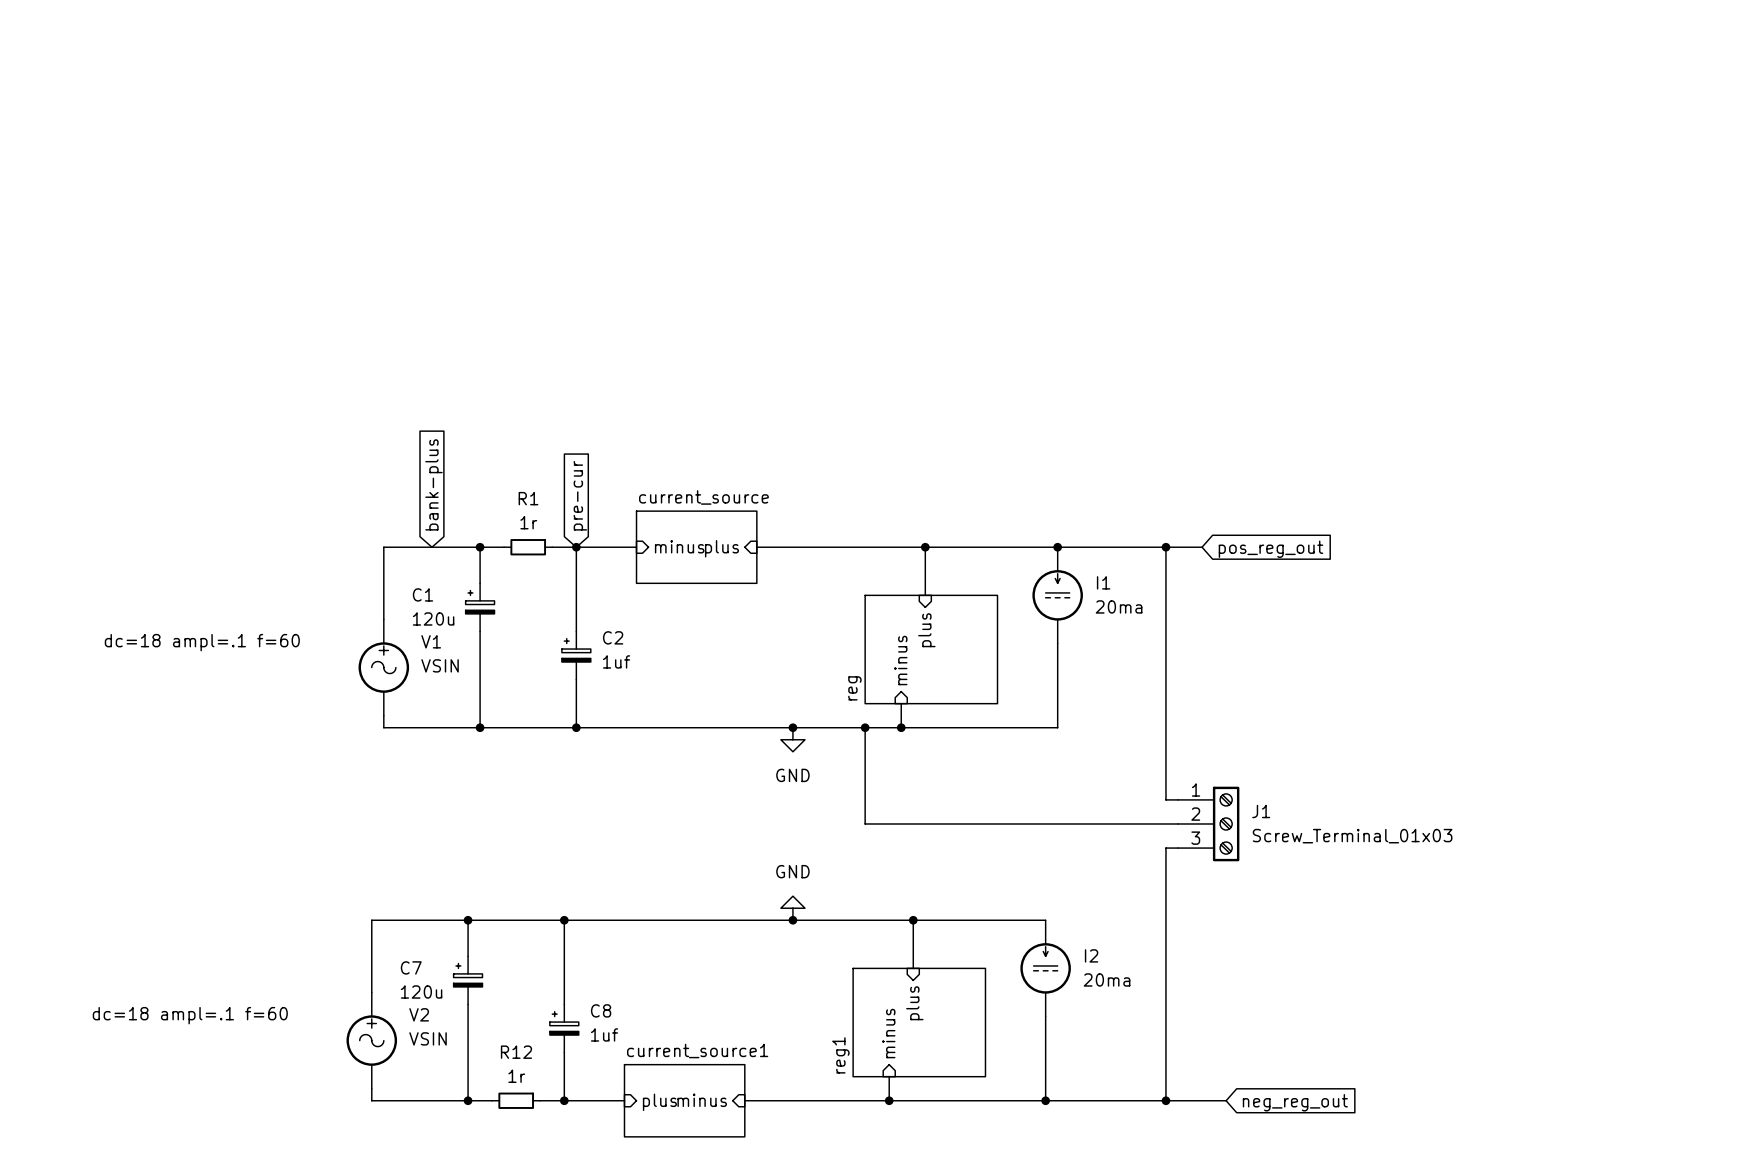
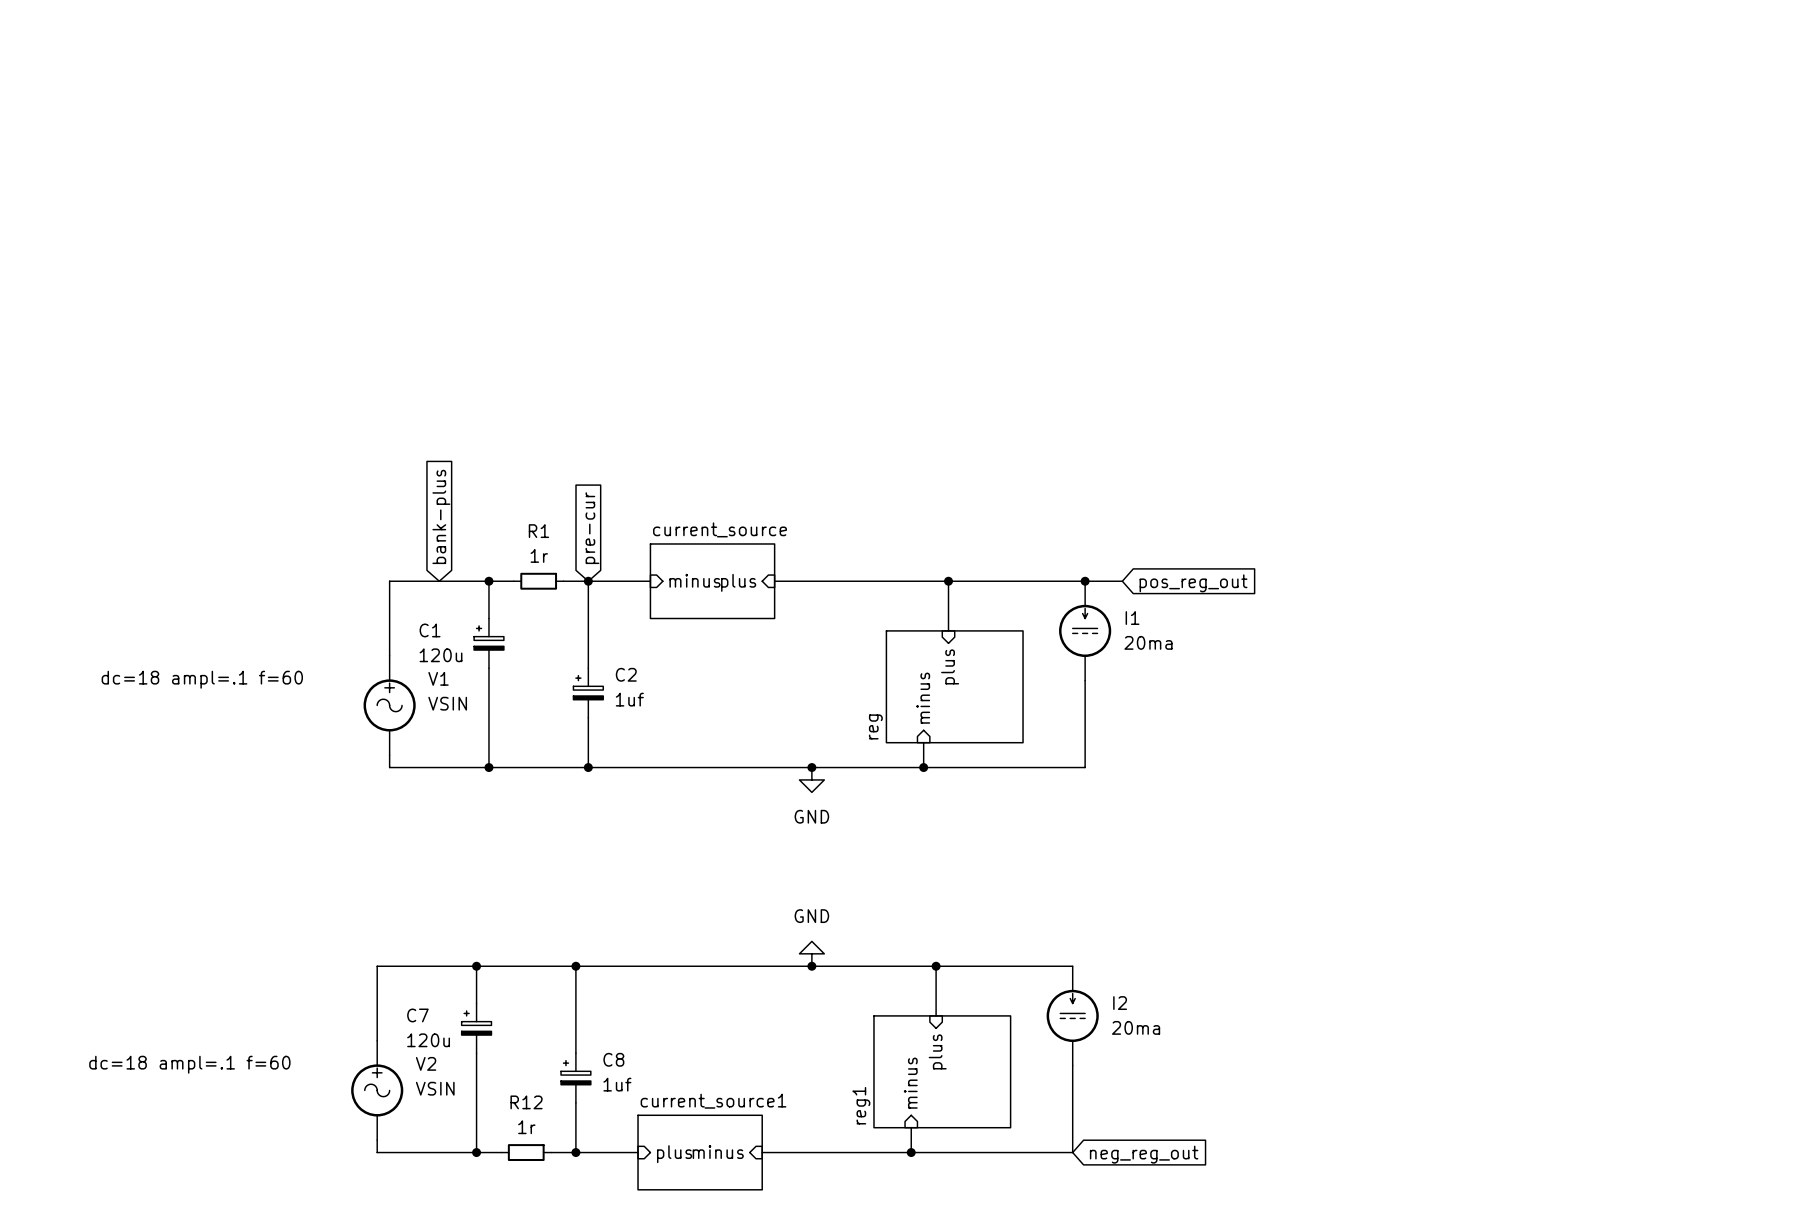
wire: (1093, 547) (1202, 547) -> none
wire: (1165, 547) (1165, 799) (1178, 799) -> none
junction: (1165, 547) -> none
global label position: pos_reg_out (1271, 549) -> pos_reg_out (1193, 583)
wire: (865, 727) (865, 823) (1178, 823) -> none
junction: (865, 727) -> none
J1: Screw_Terminal_01x03 (1208, 823) -> none
wire: (1178, 848) (1165, 848) (1165, 1100) -> none
wire: (1045, 1100) (1226, 1100) -> none
junction: (1045, 1100) -> none
junction: (1165, 1100) -> none
global label position: neg_reg_out (1295, 1102) -> neg_reg_out (1144, 1154)

